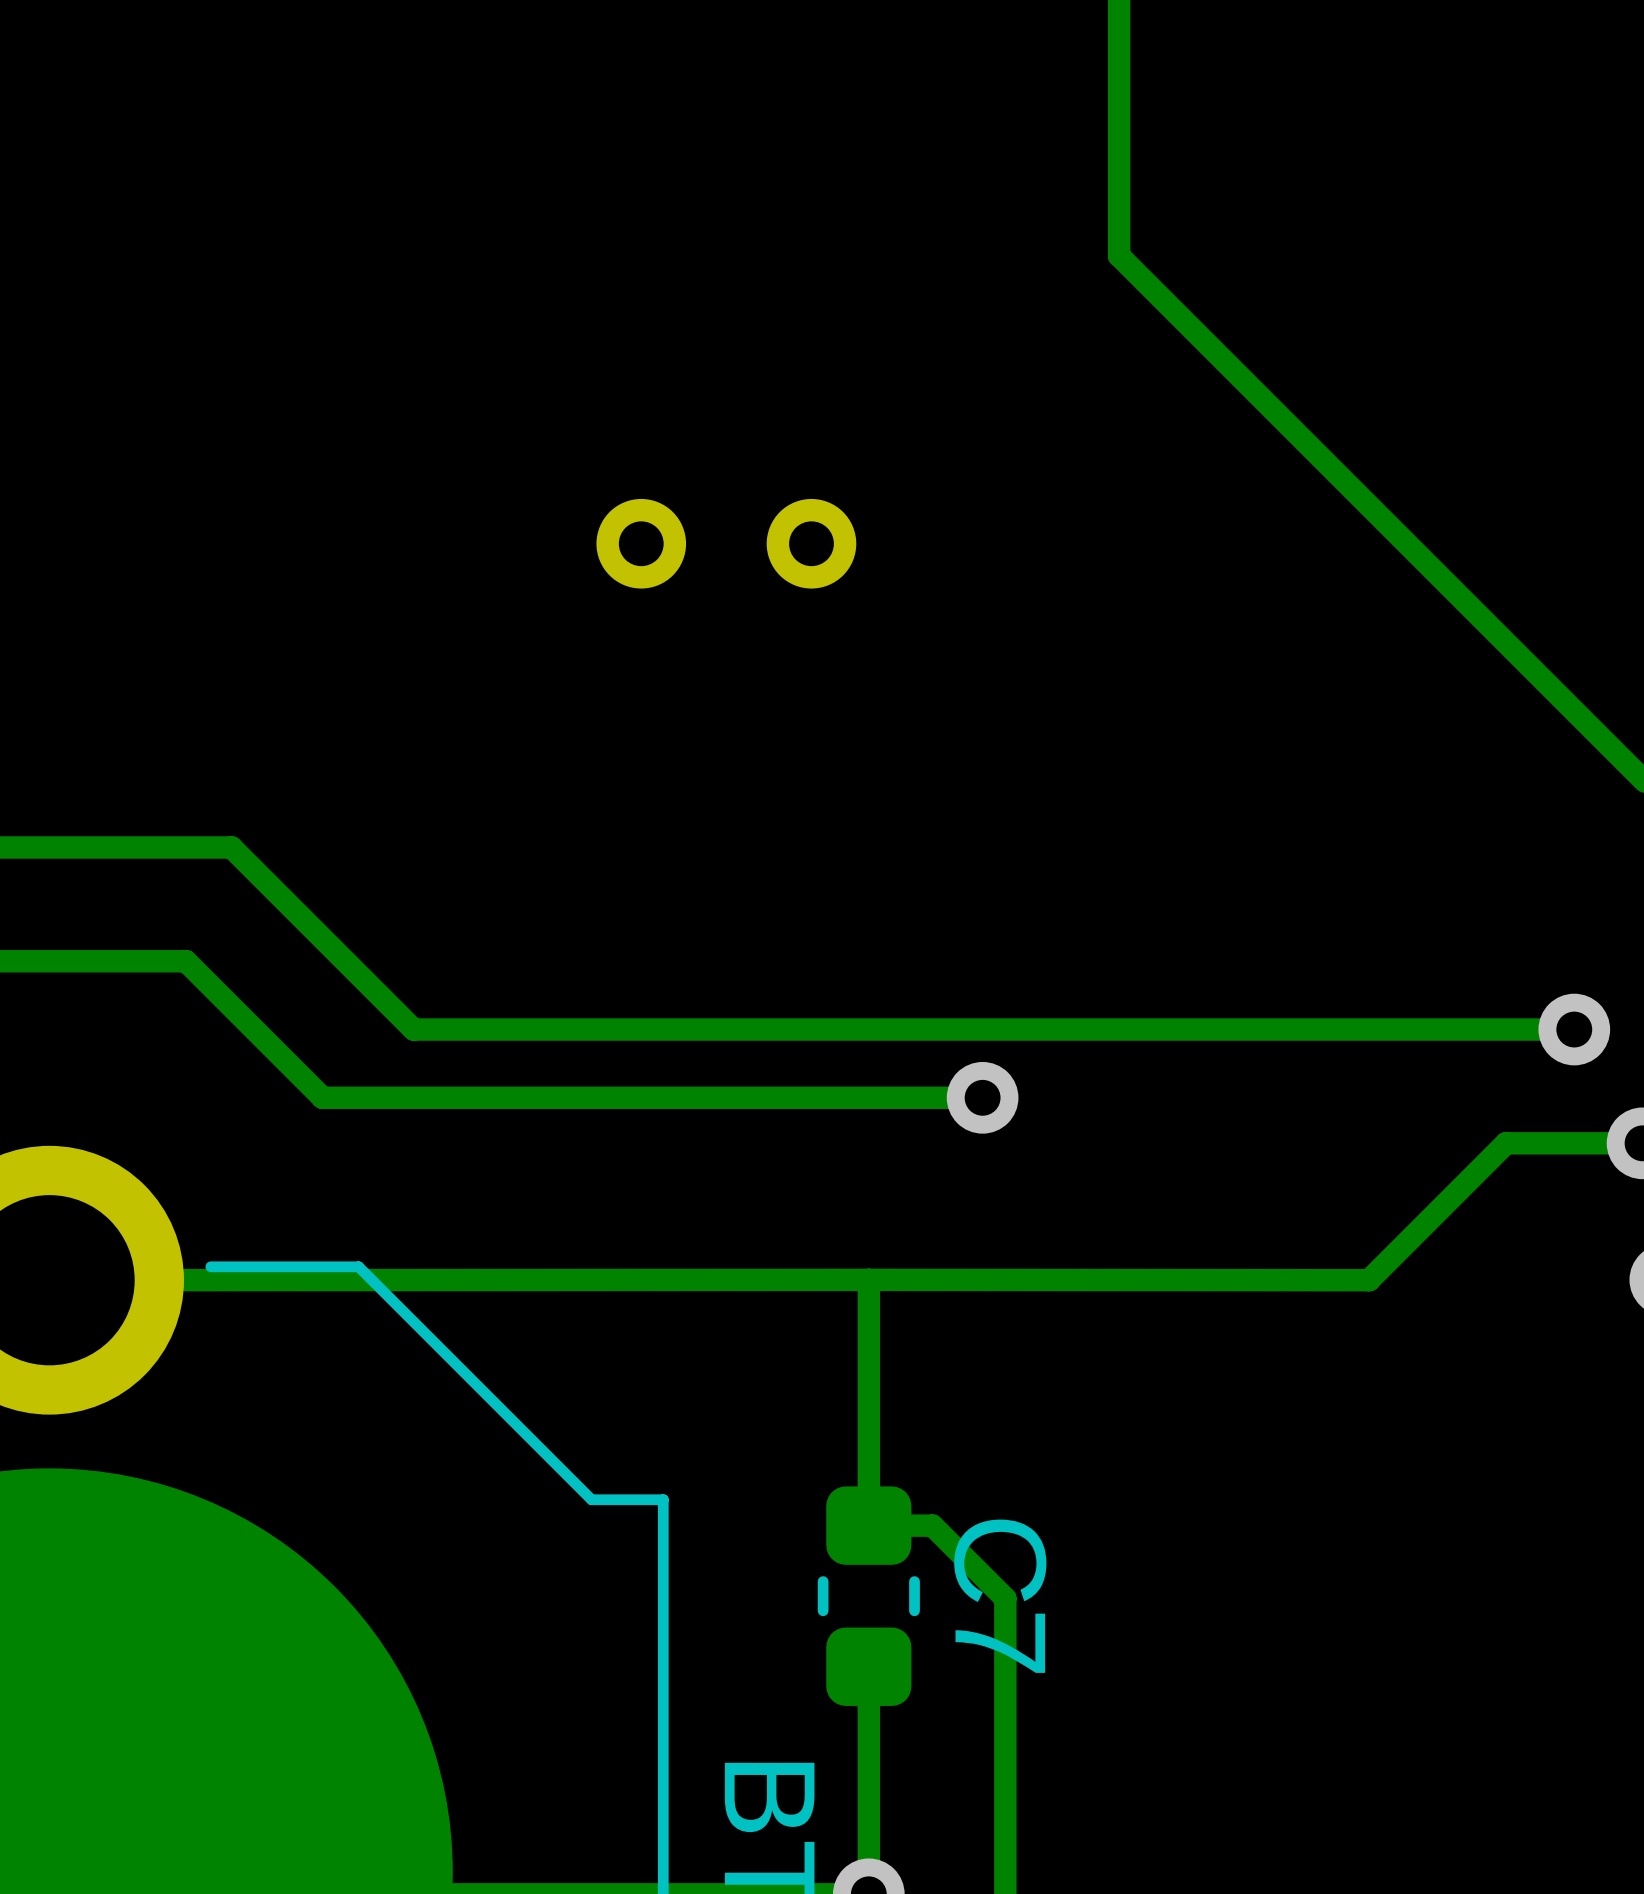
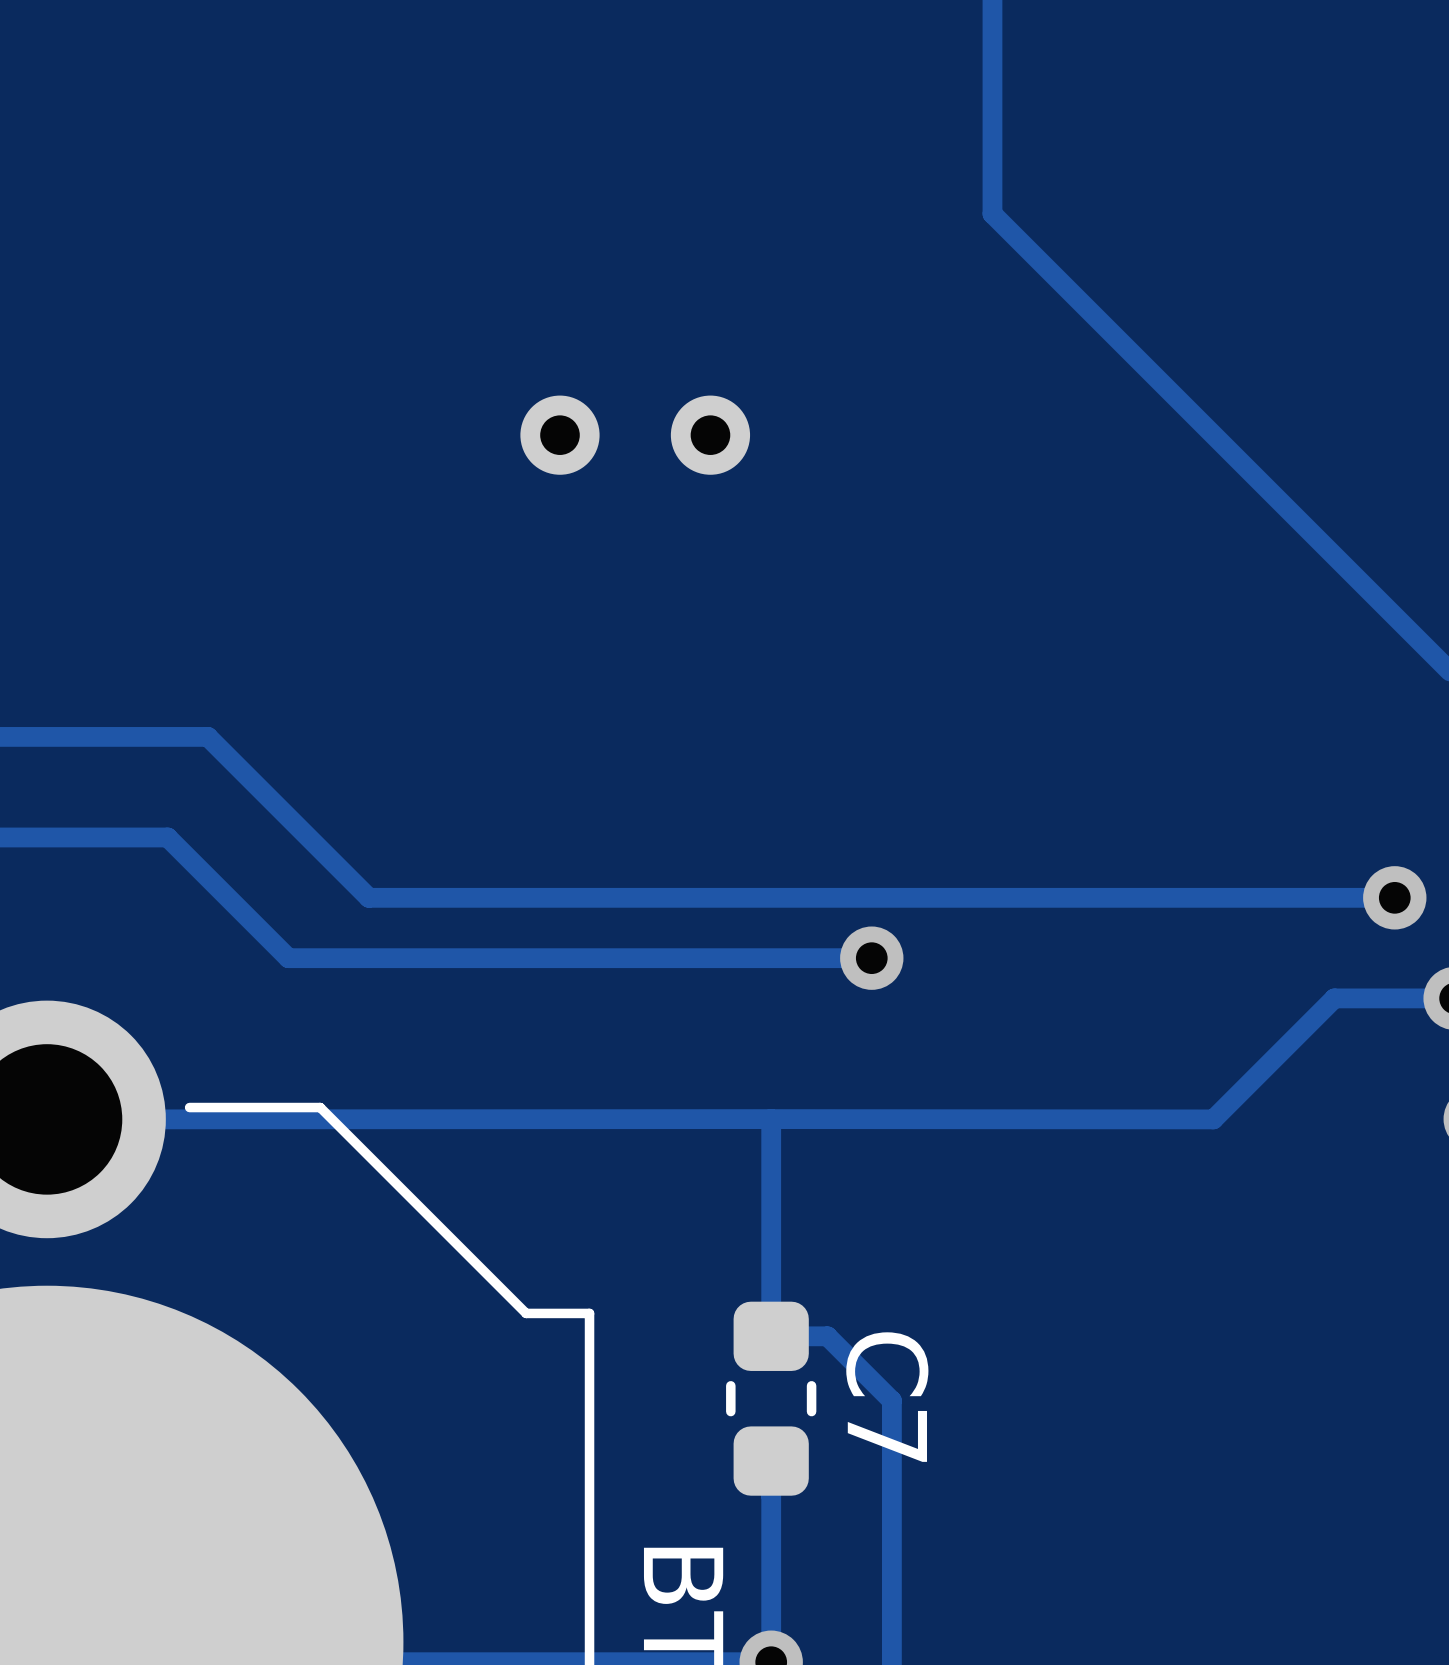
part position: (726, 543) -> (635, 435)

